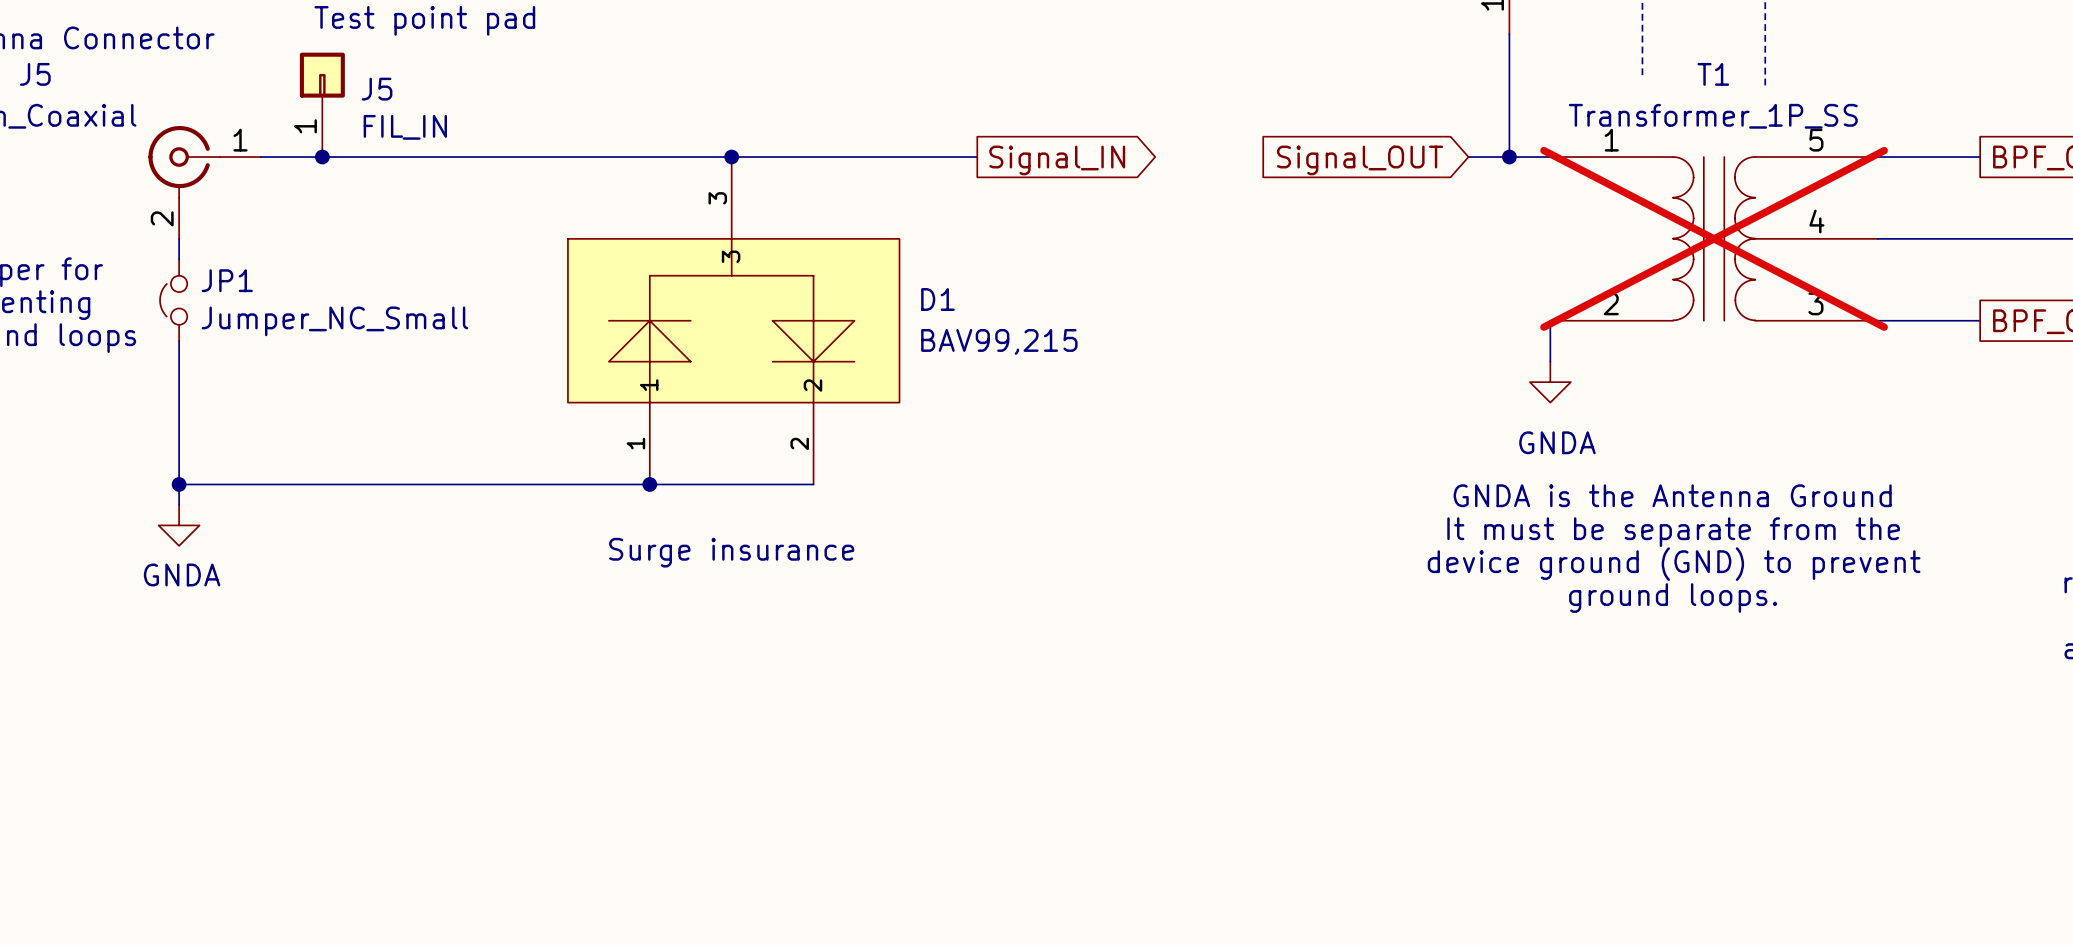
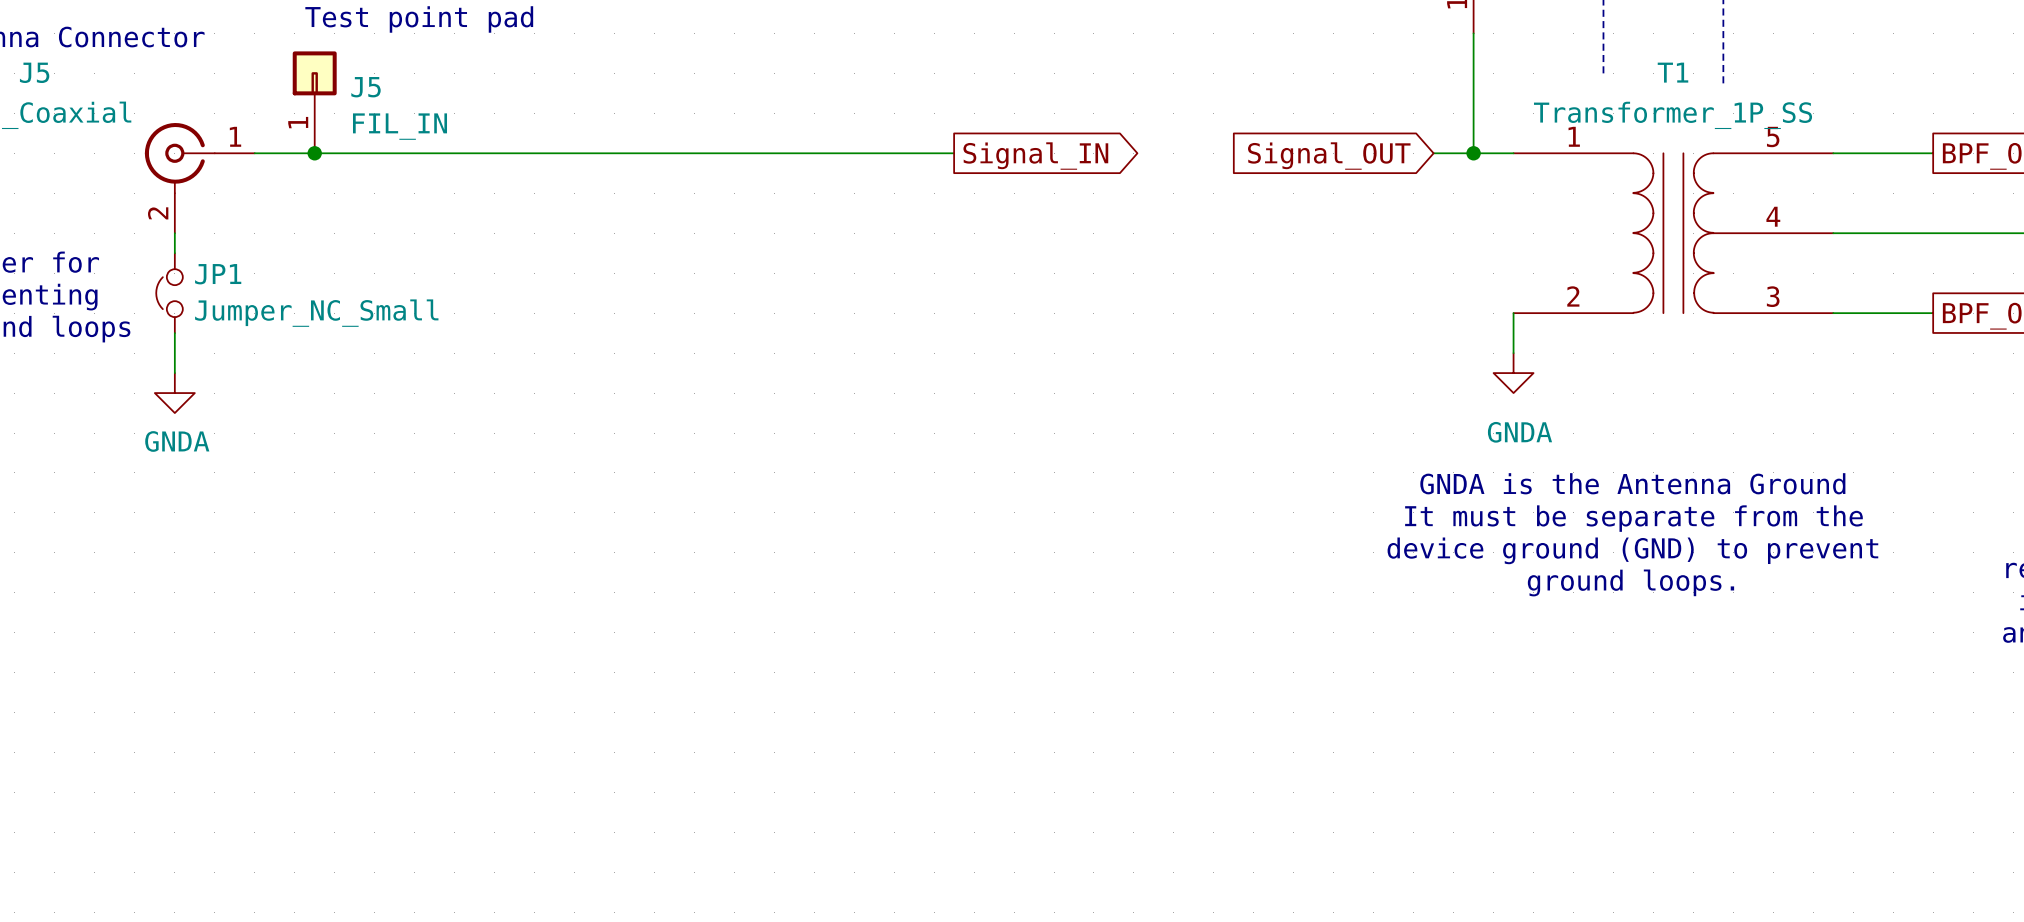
junction: (731, 157) -> none
T1 do-not-place cross: (1714, 238) -> none
D1: BAV99,215 (733, 320) -> none
wire: (179, 382) (179, 504) -> none
wire: (179, 484) (813, 484) -> none
junction: (179, 484) -> none
junction: (649, 484) -> none
power symbol position: GNDA (179, 525) -> GNDA (174, 393)
text: Surge insurance (731, 552) -> none

